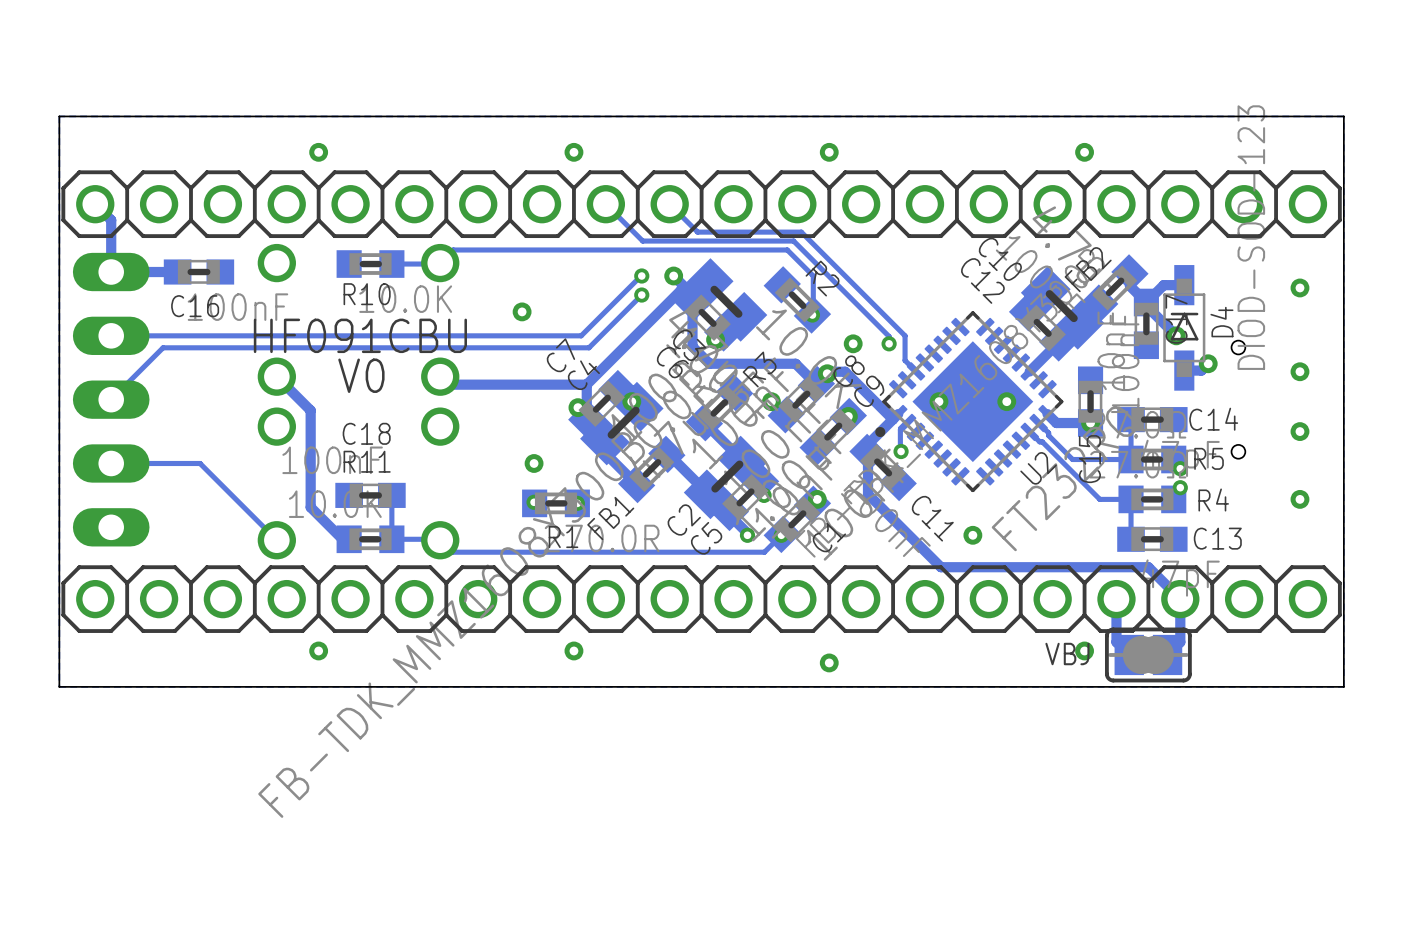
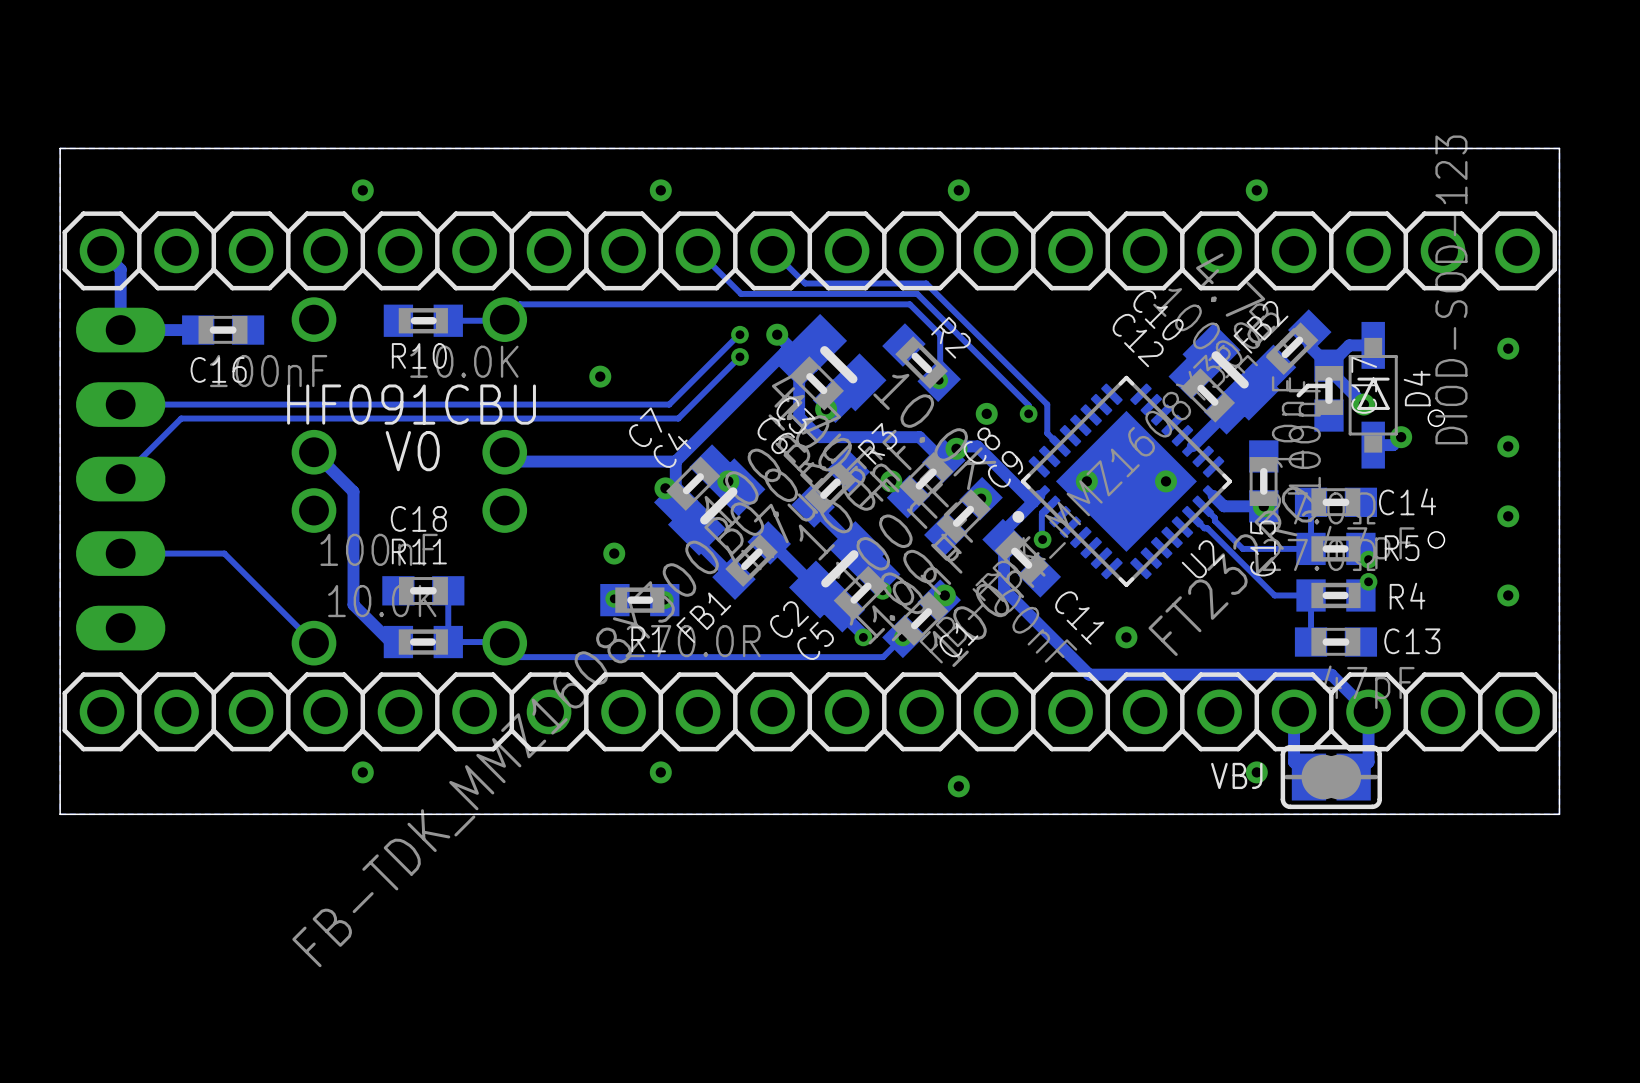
line: none -> (1326, 385) (1308, 385) (1298, 395)

